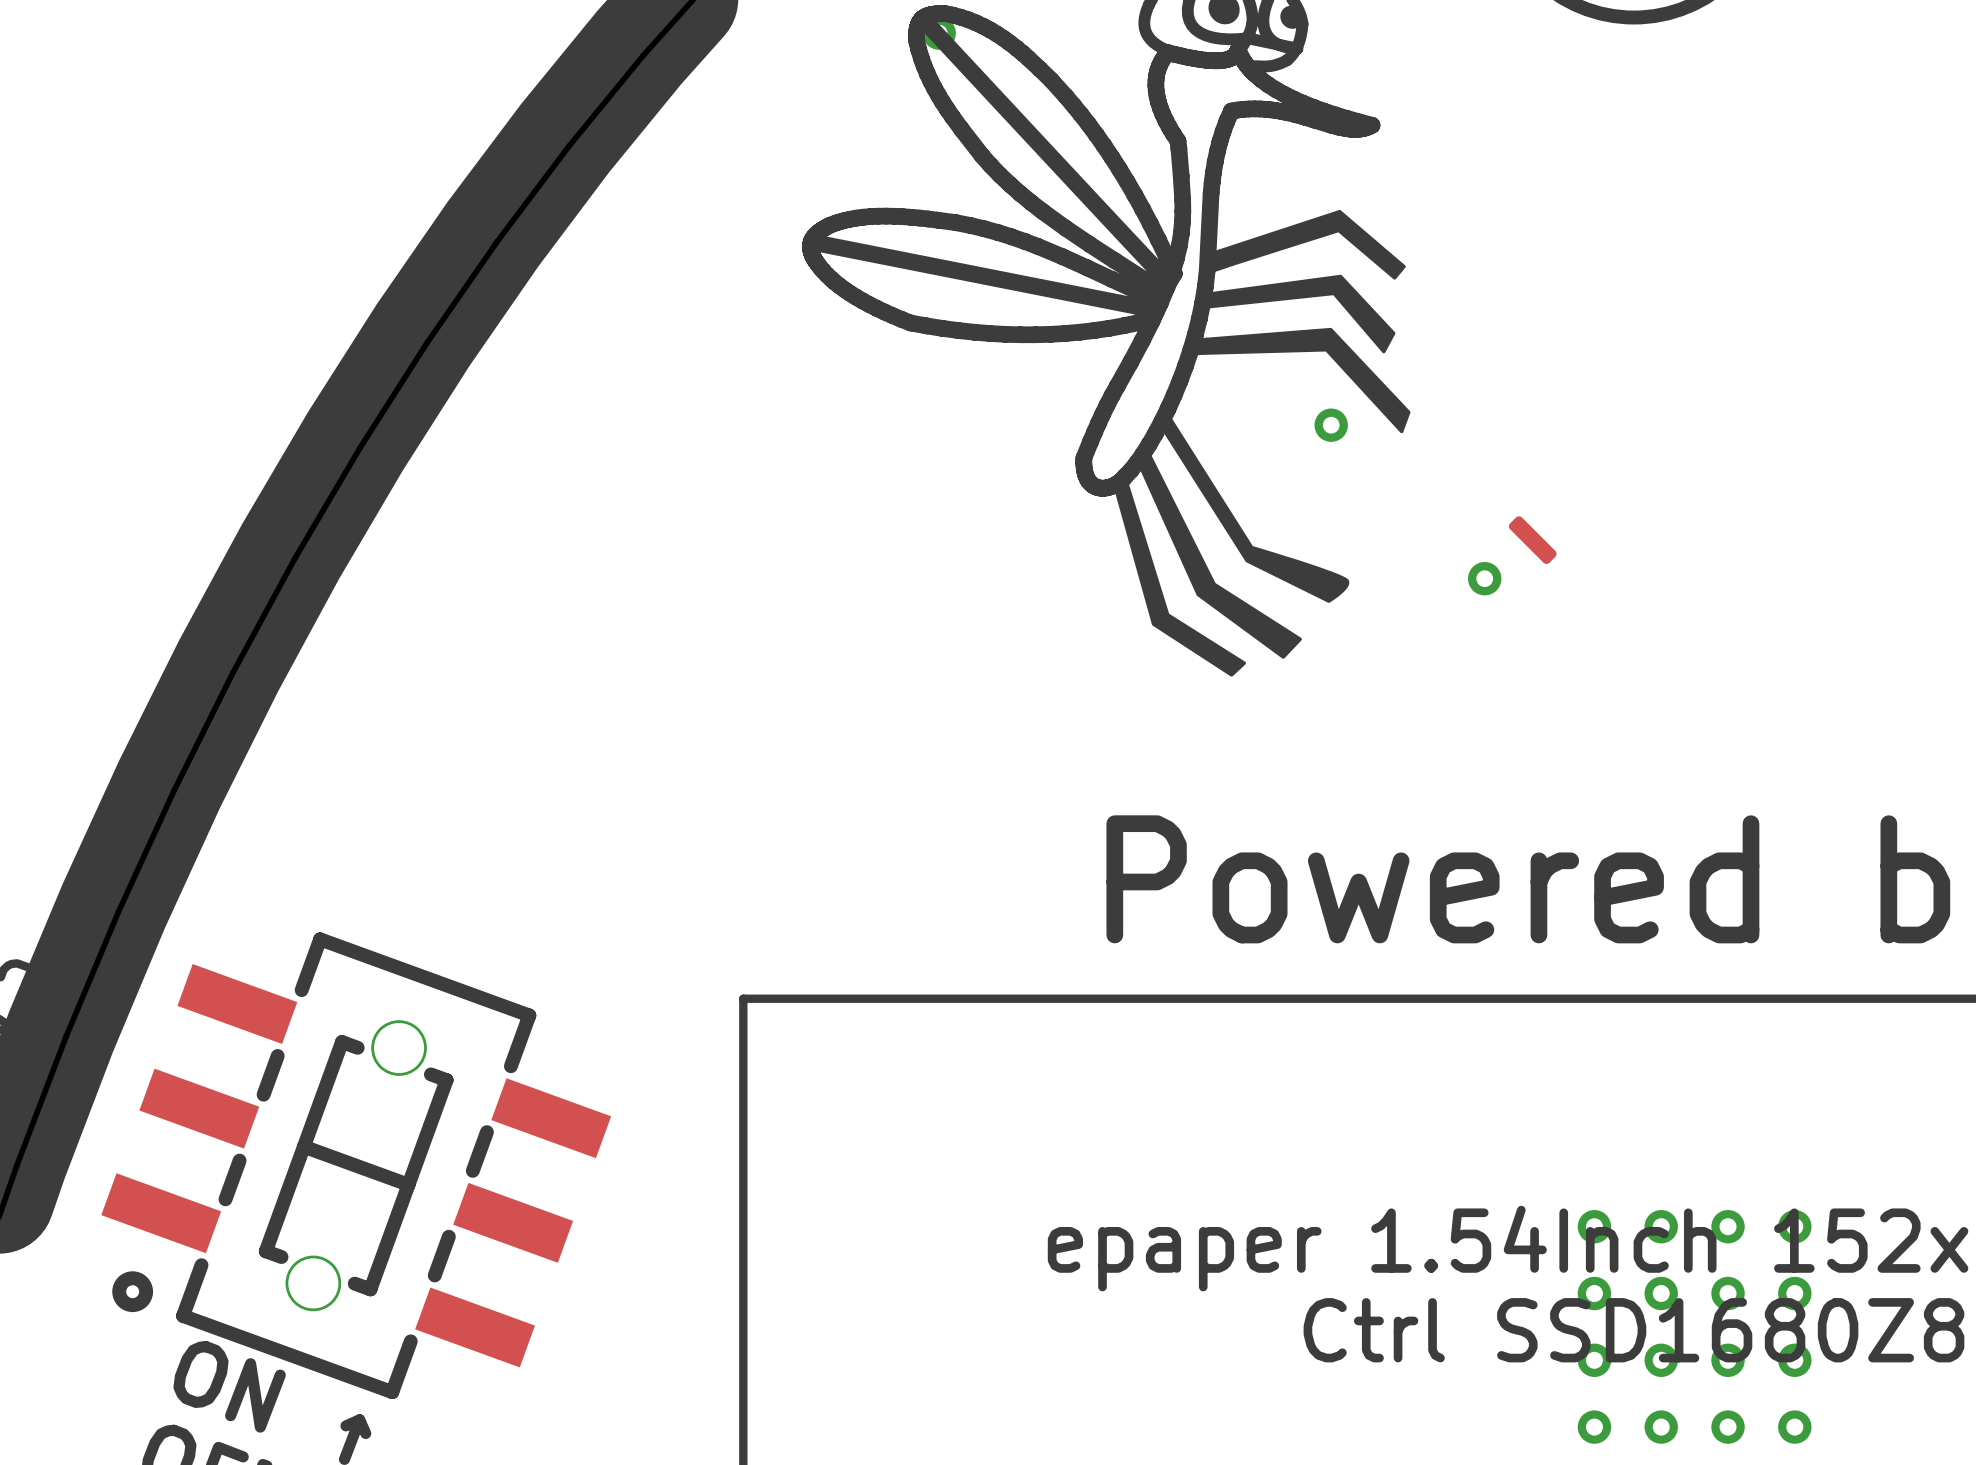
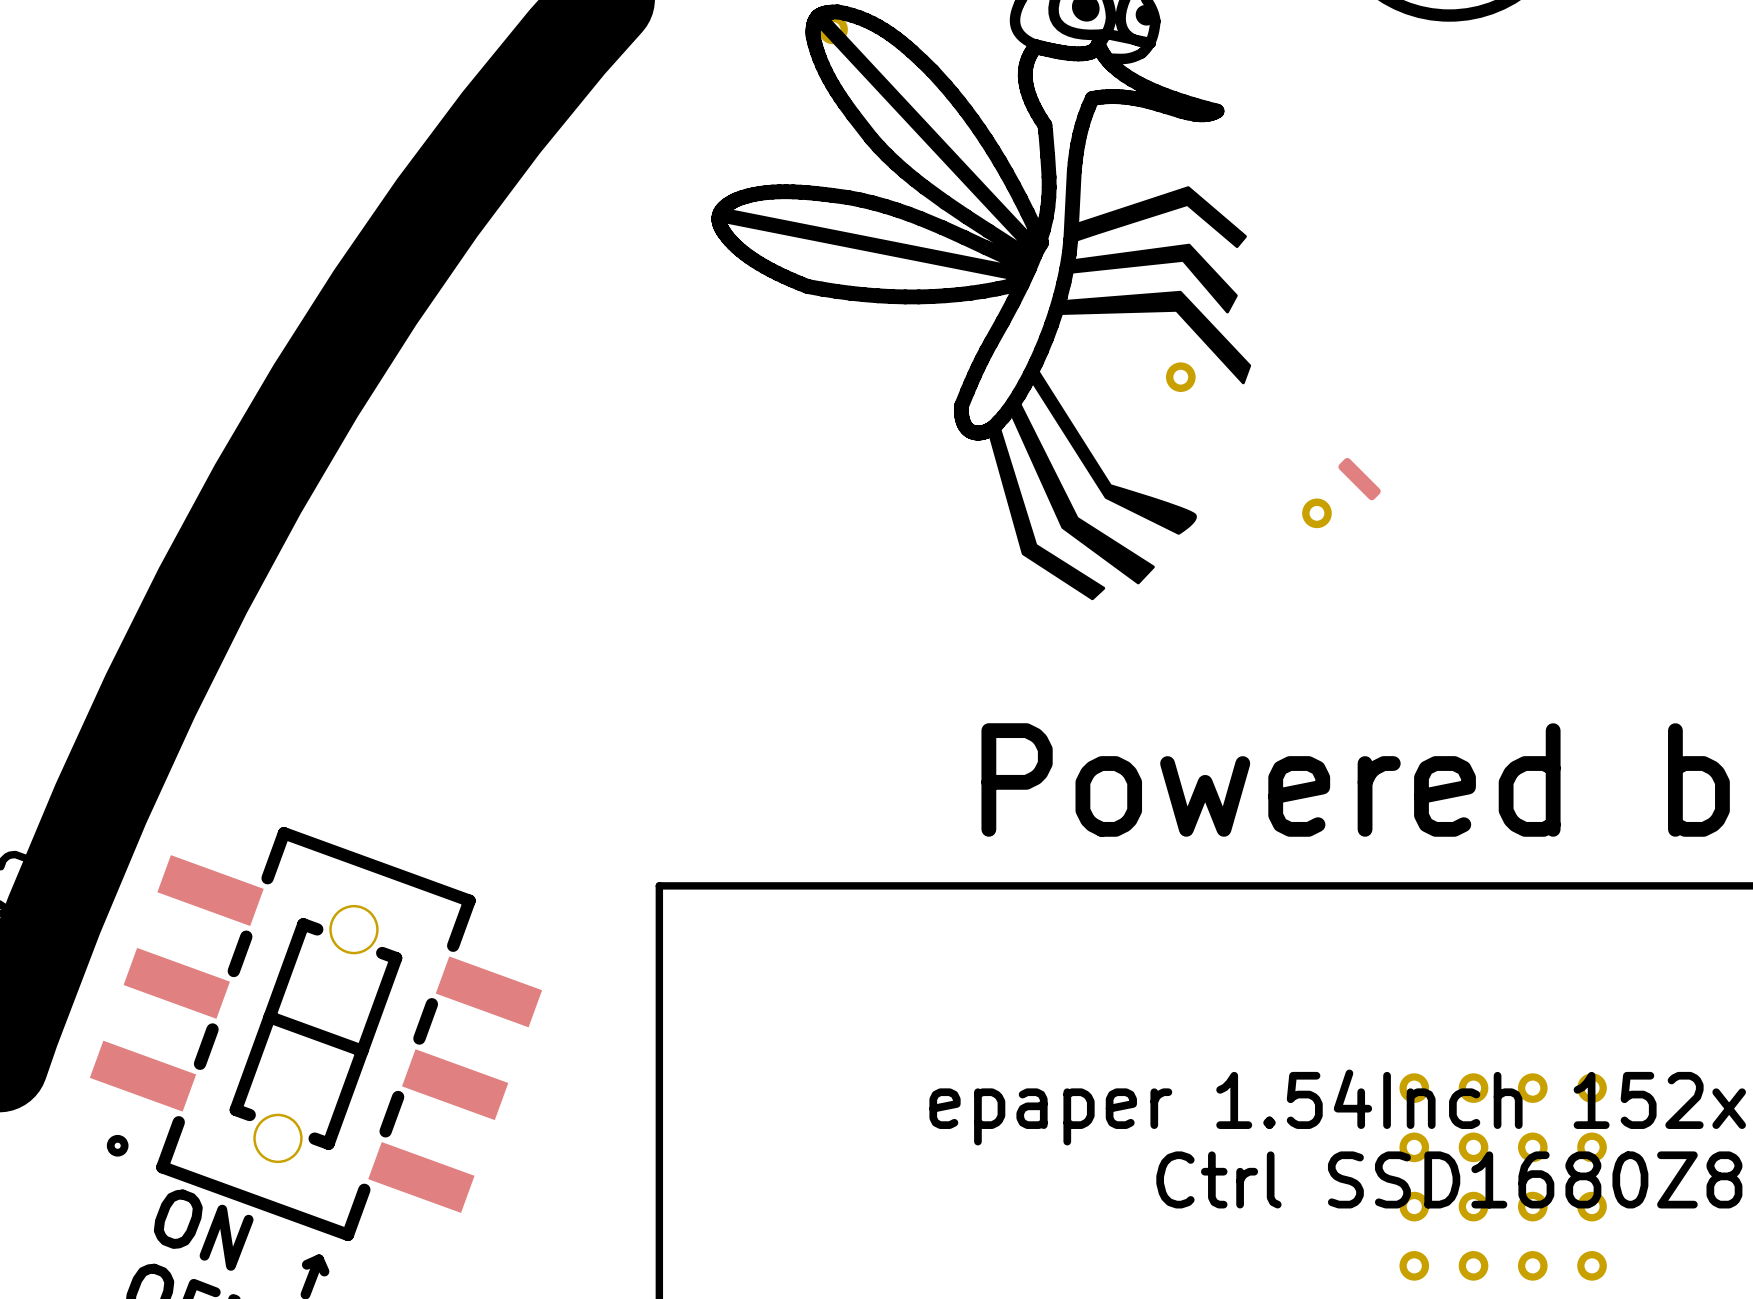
part footprint: [101, 932, 612, 1400] -> [89, 827, 543, 1241]

